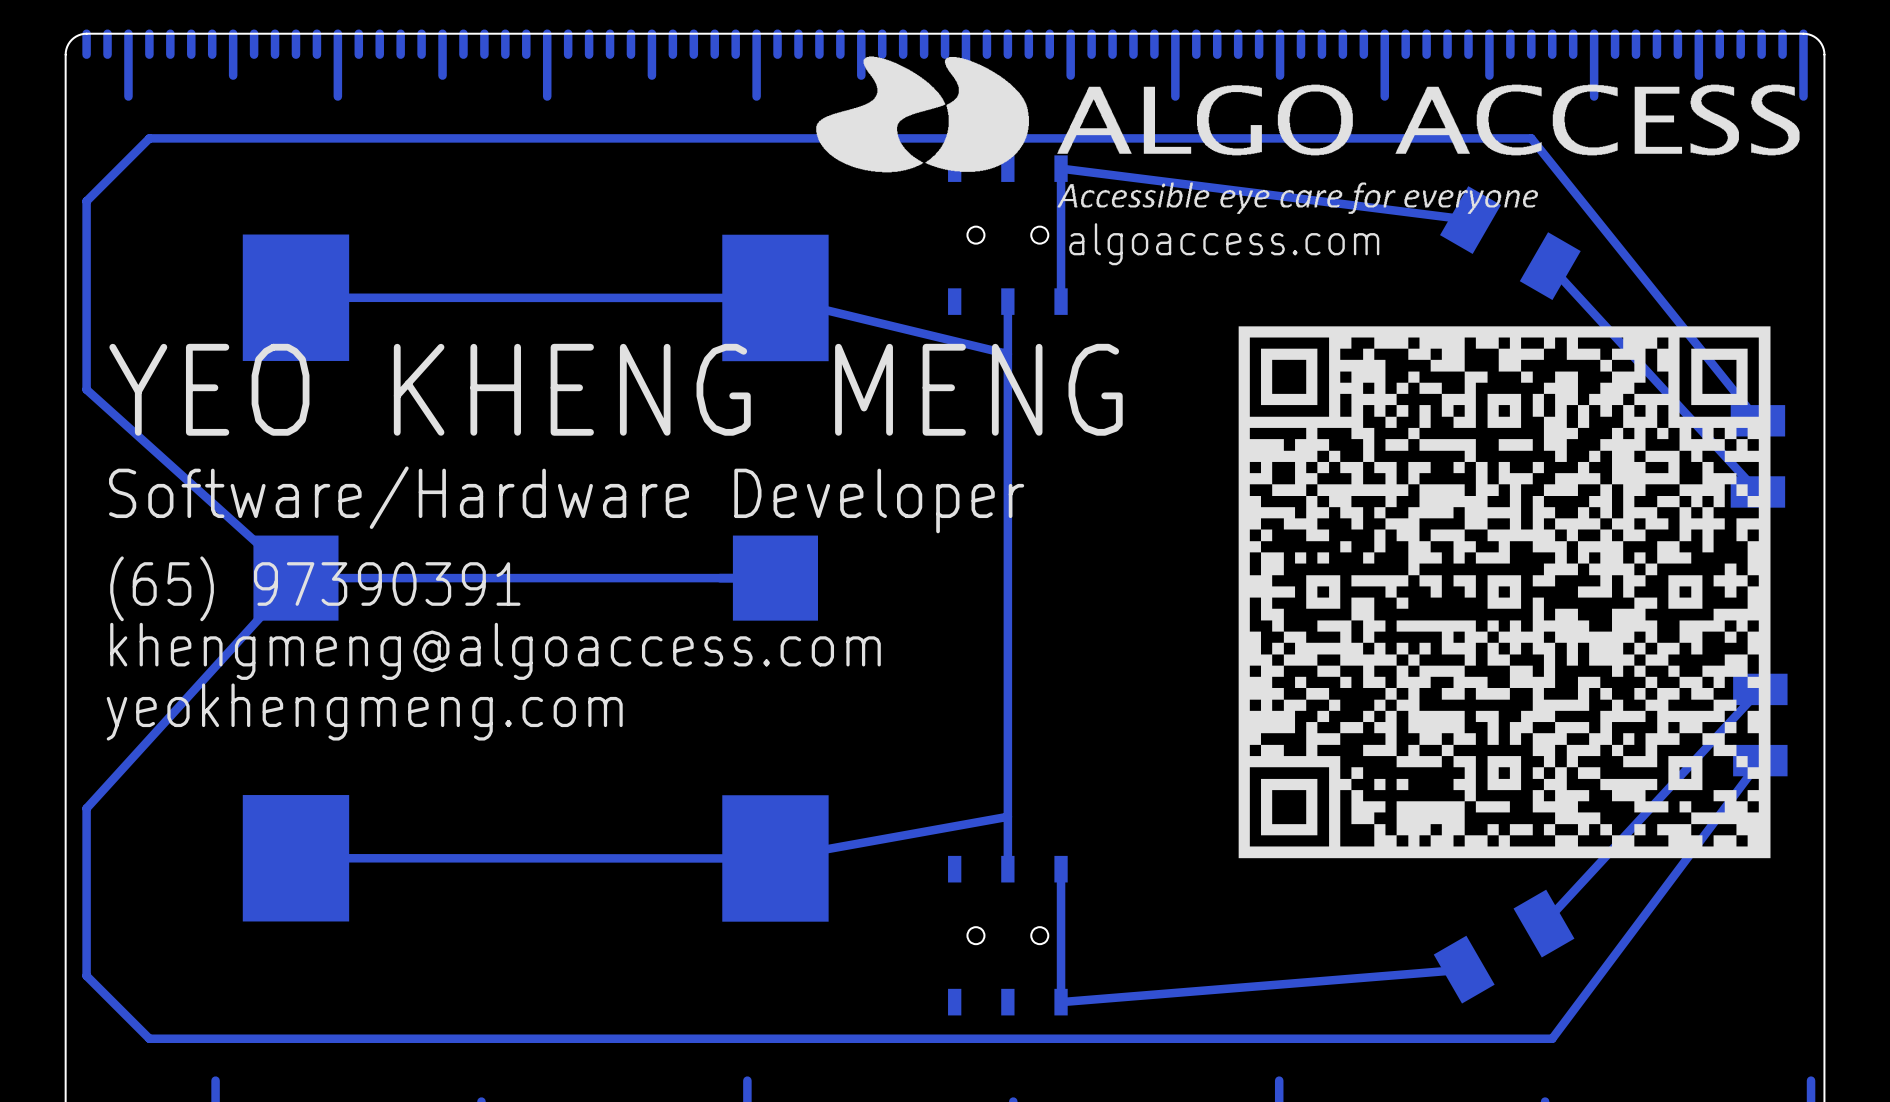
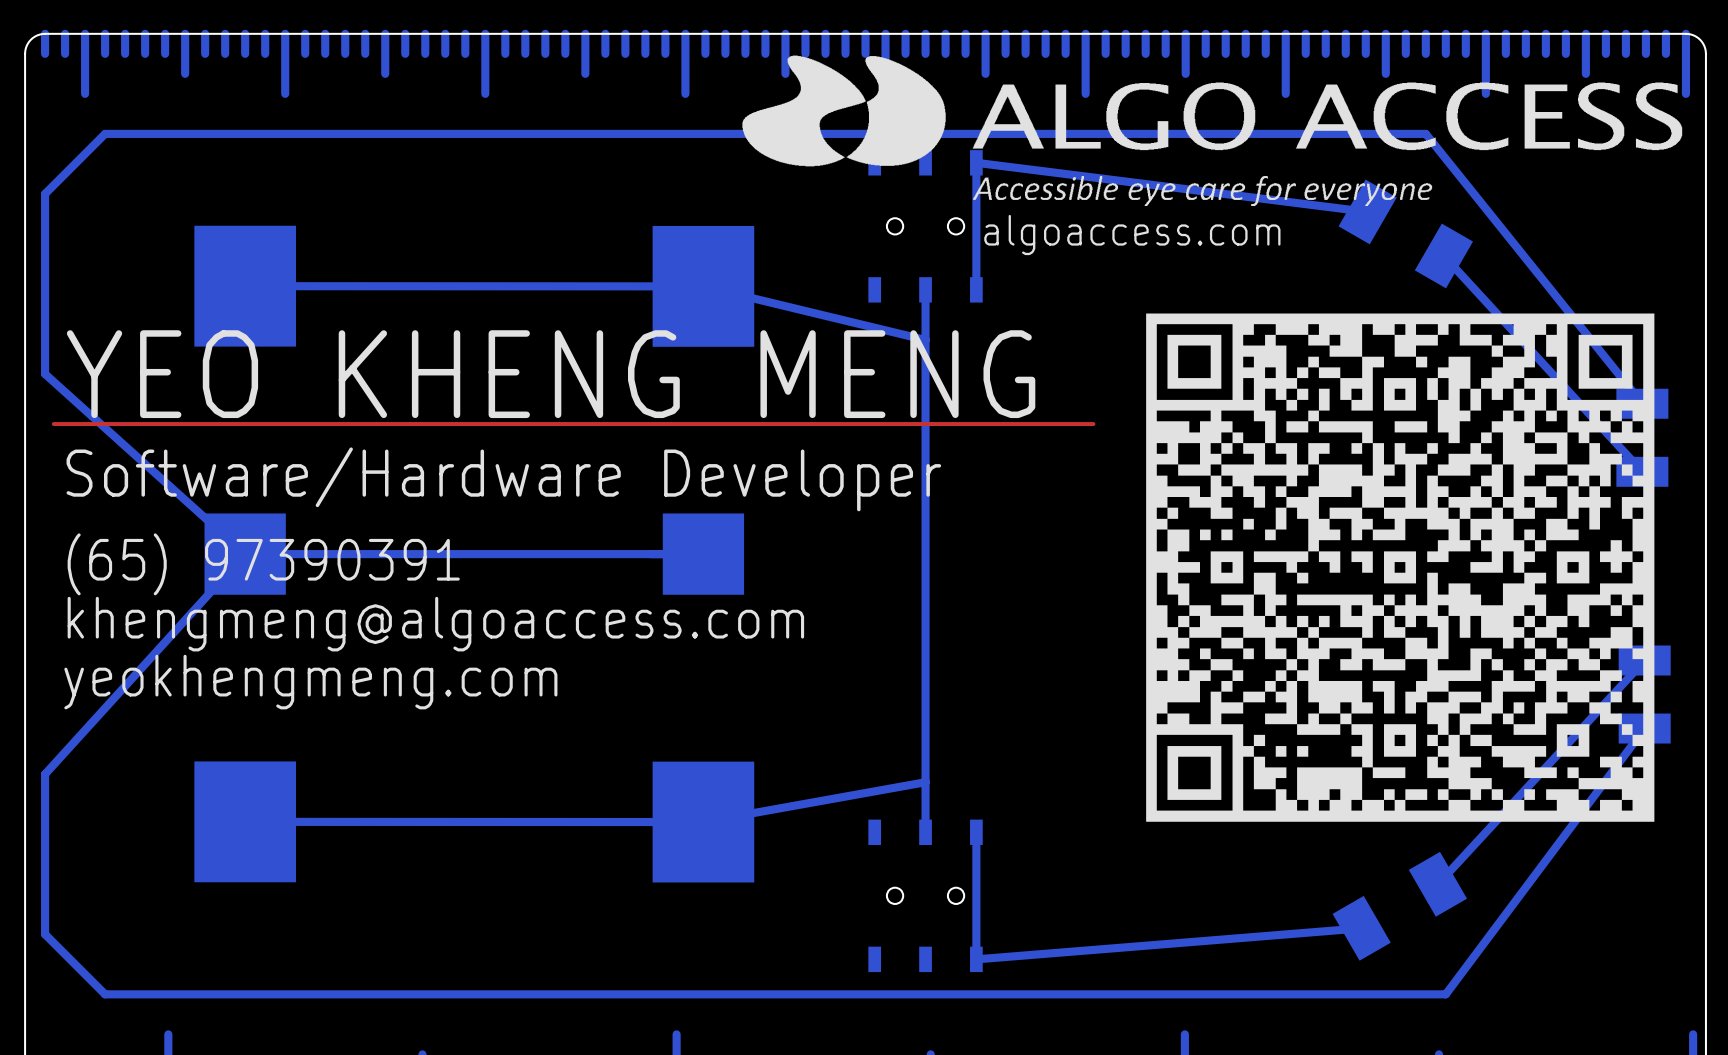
top track: none -> (53, 424) (1093, 424)

